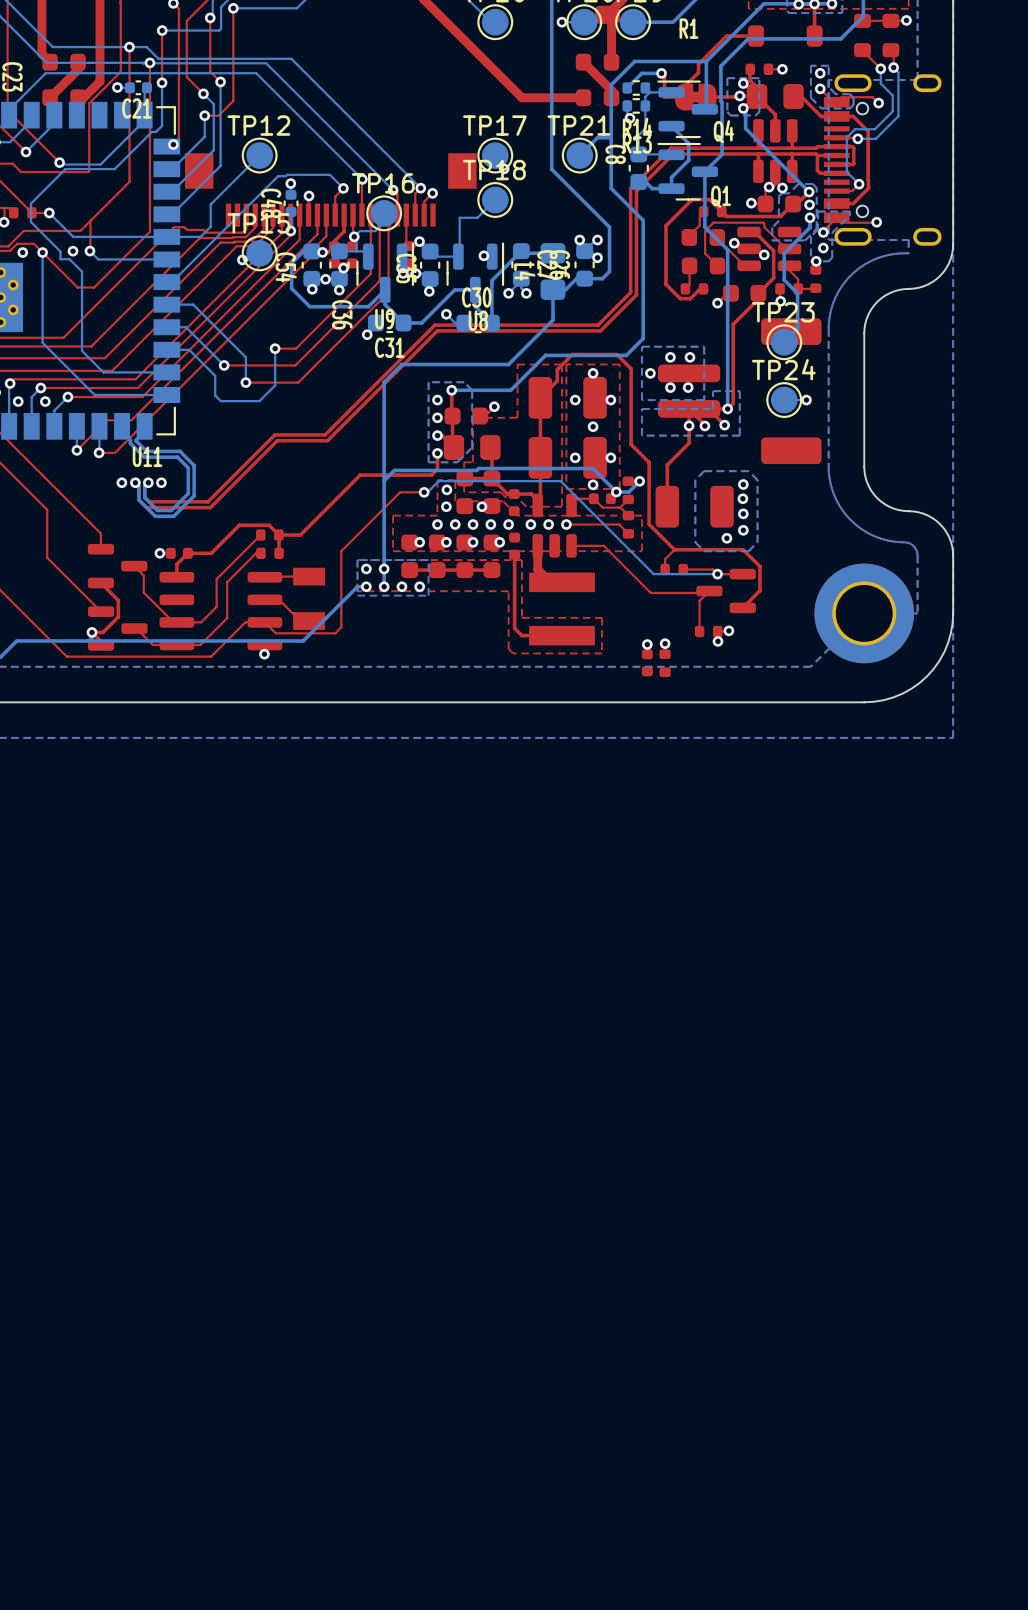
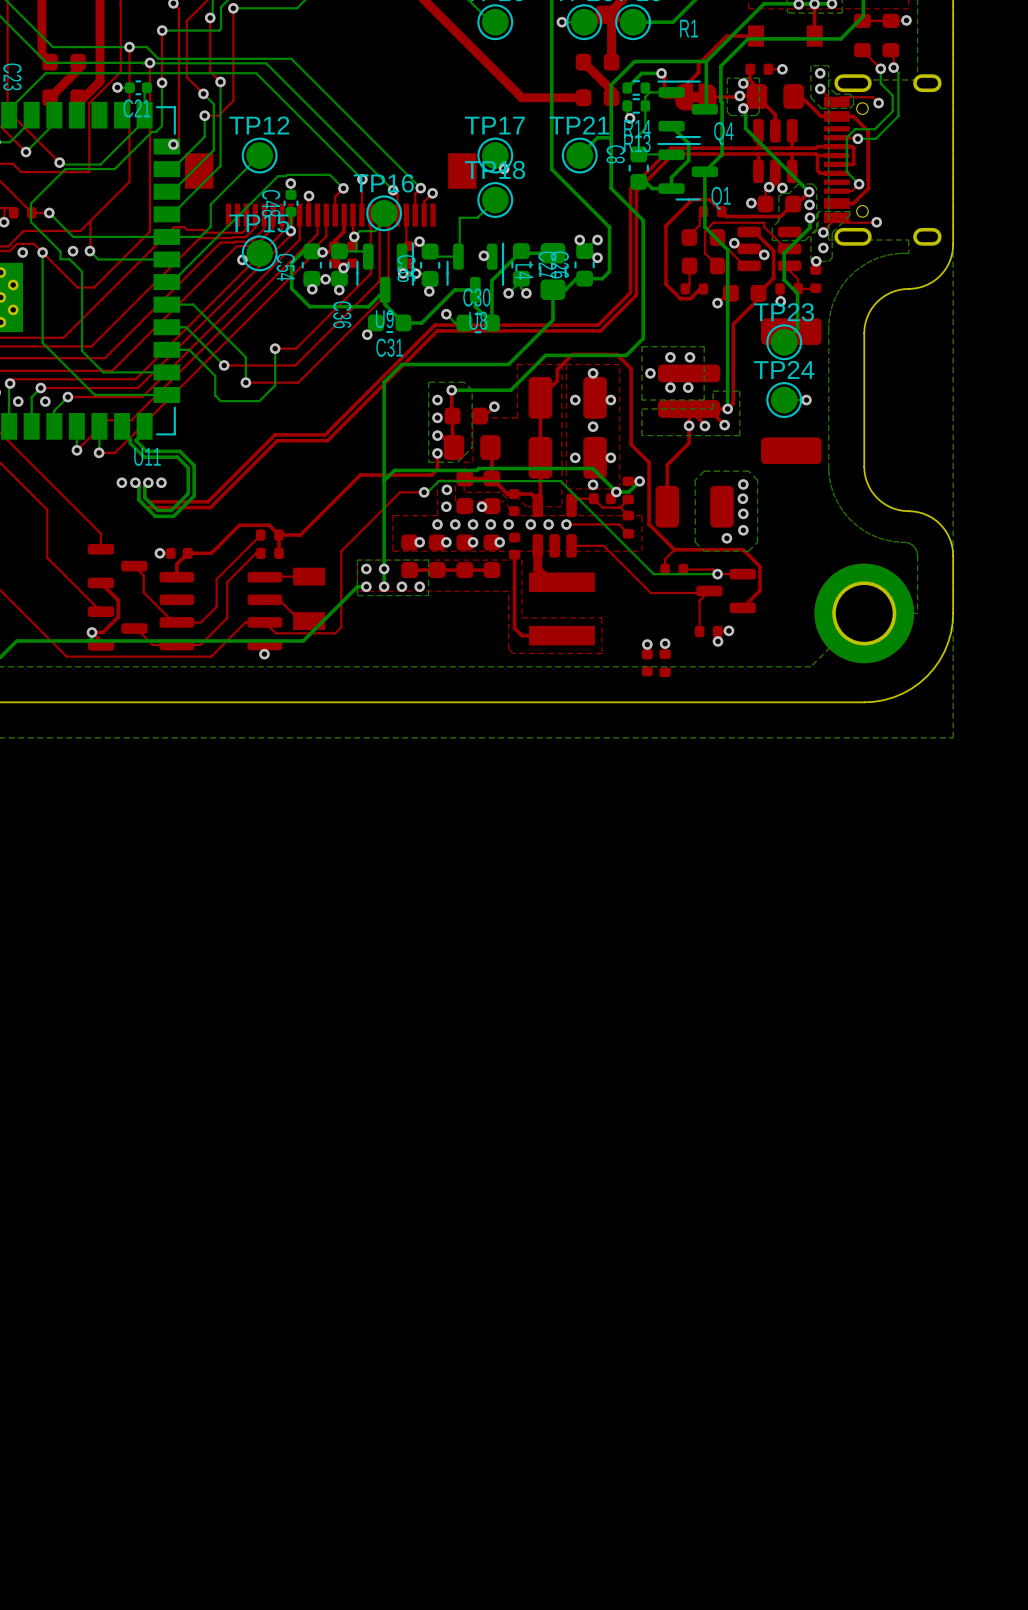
part footprint: [747, 25, 823, 47] -> [747, 25, 823, 47]

